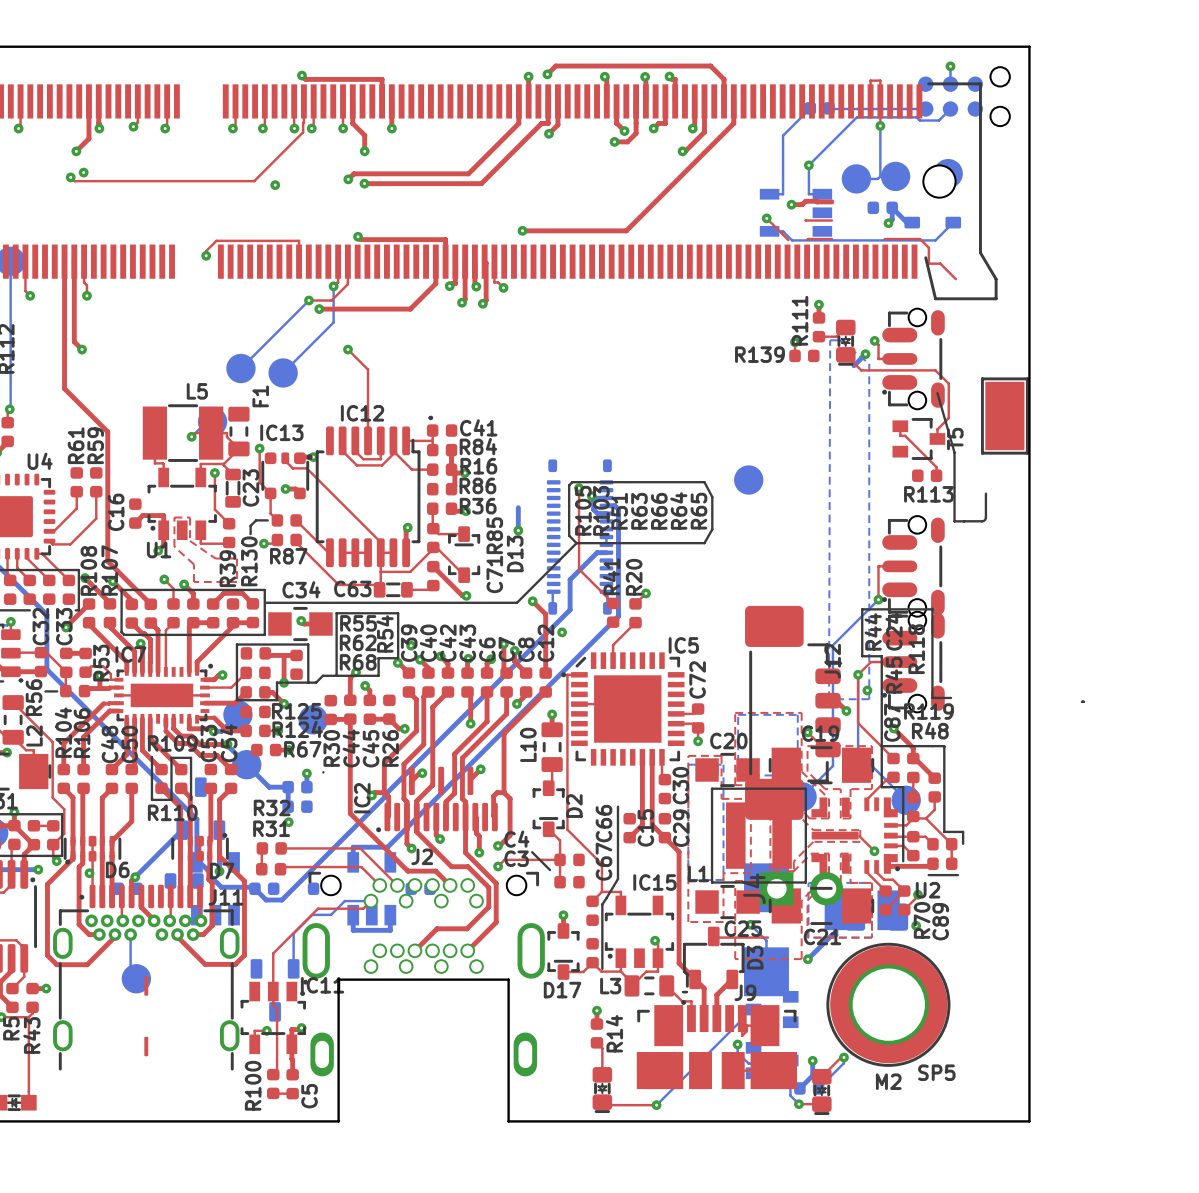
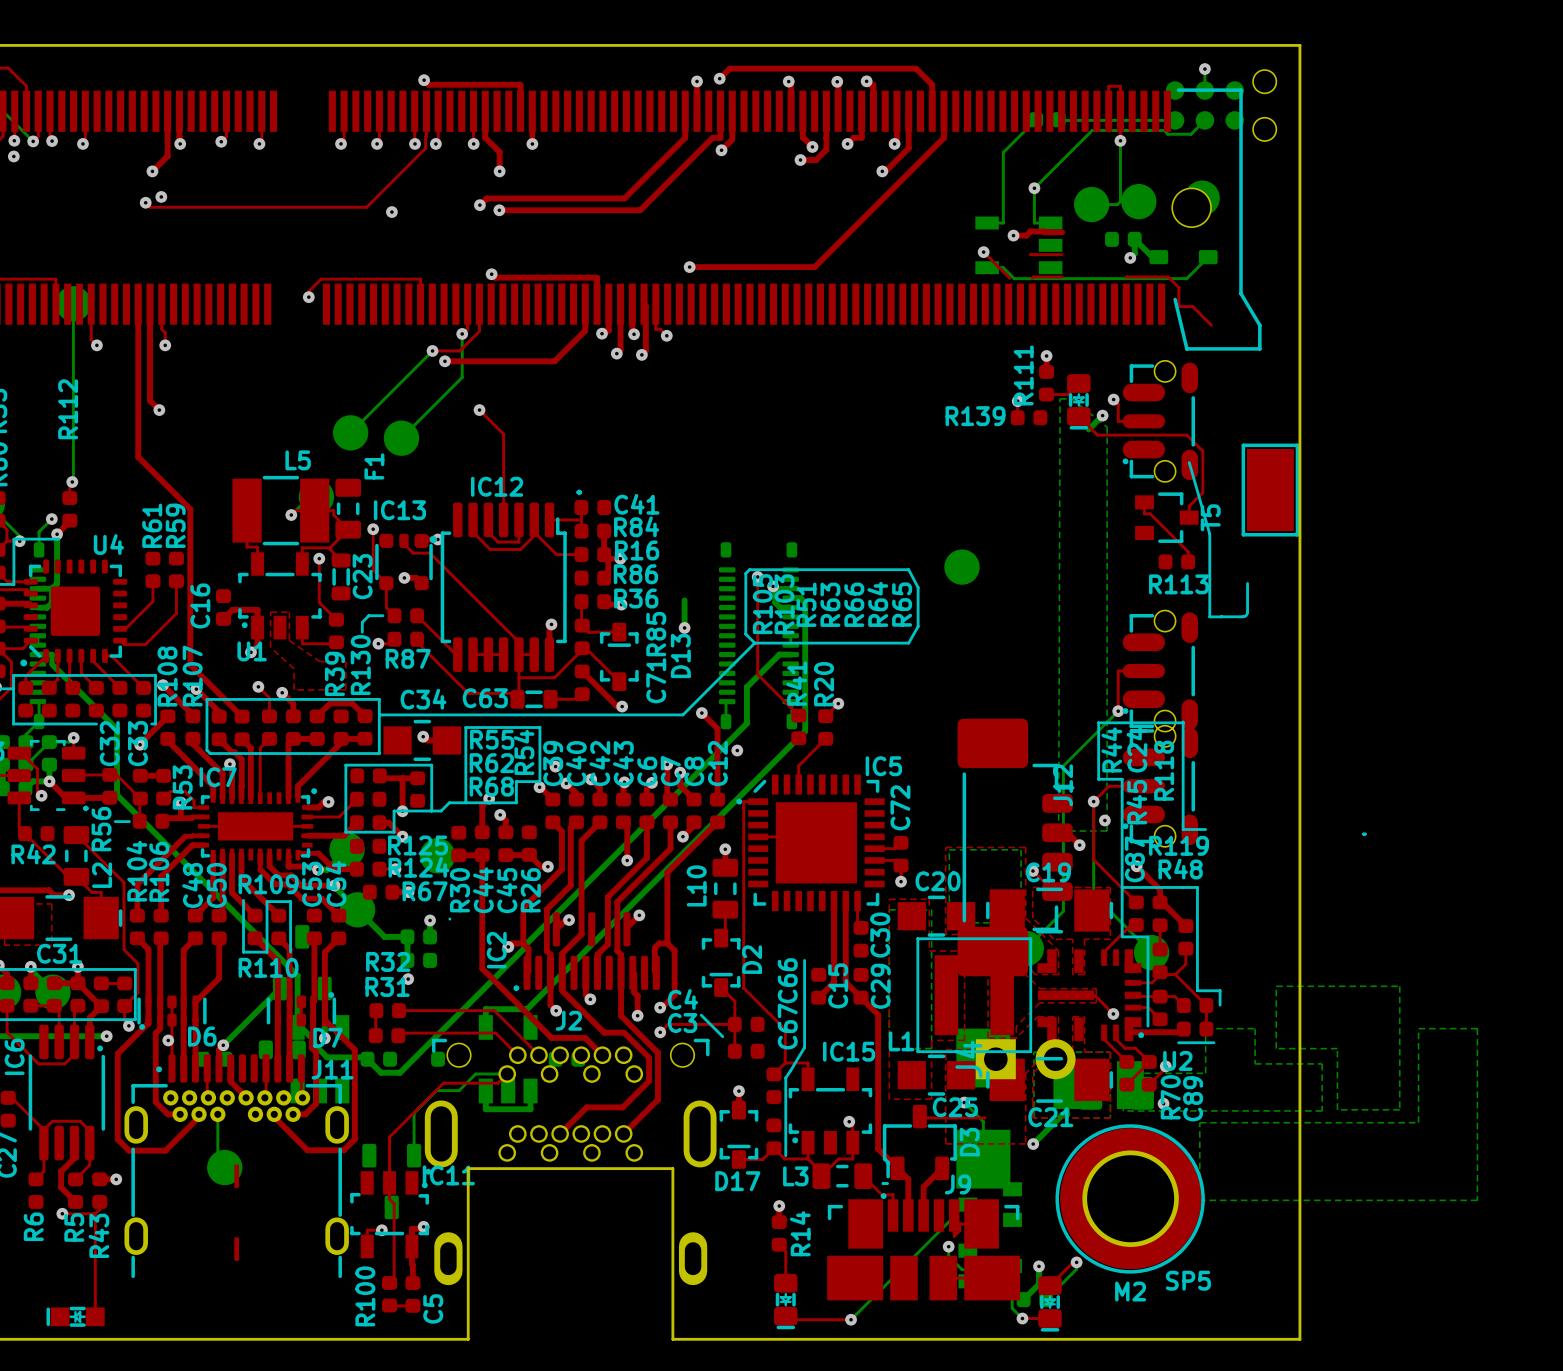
bottom zone outline: none -> (1276, 986) (1276, 1048) (1337, 1048) (1337, 1109) (1399, 1109) (1399, 986) (1276, 986)
bottom zone outline: none -> (1205, 1028) (1205, 1073) (1123, 1073) (1123, 1110) (1322, 1110) (1322, 1063) (1255, 1063) (1255, 1028) (1205, 1028)
bottom zone outline: none -> (1418, 1028) (1477, 1028) (1477, 1200) (1199, 1200) (1199, 1122) (1418, 1122) (1418, 1028)

